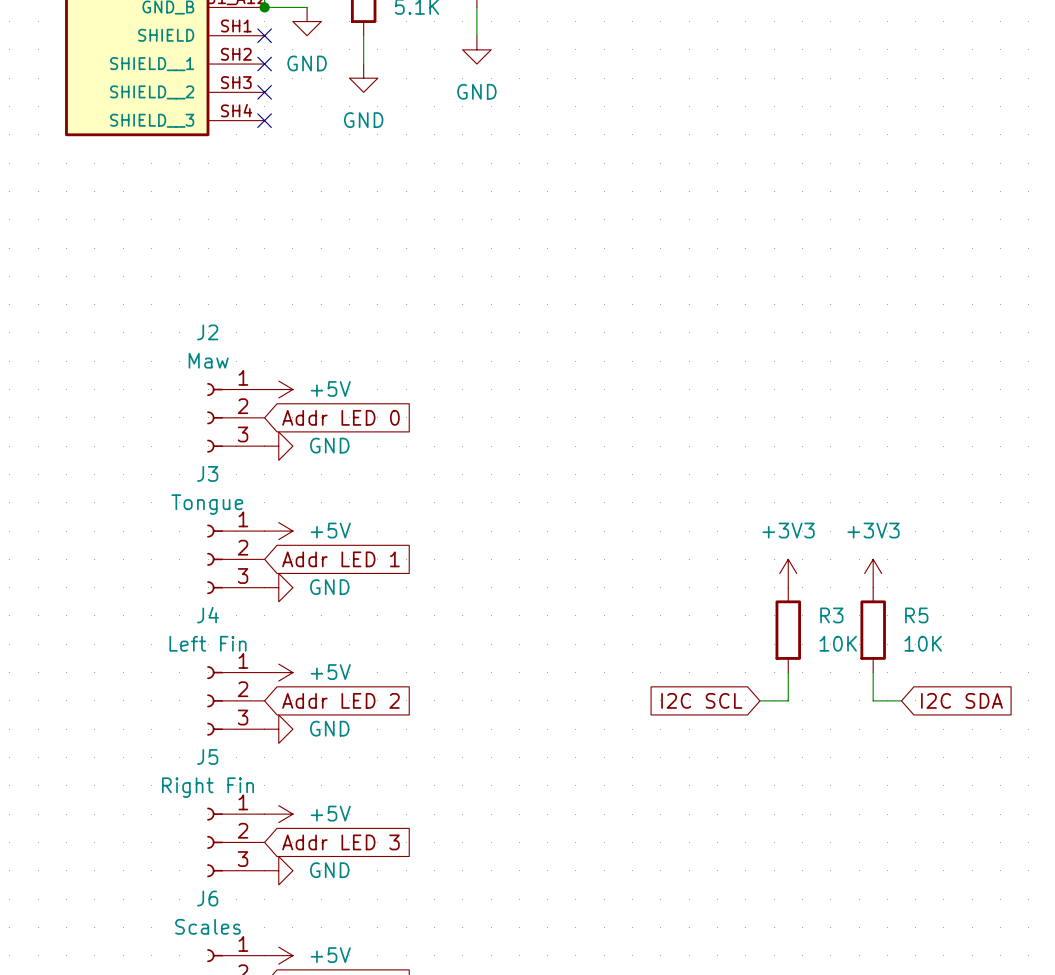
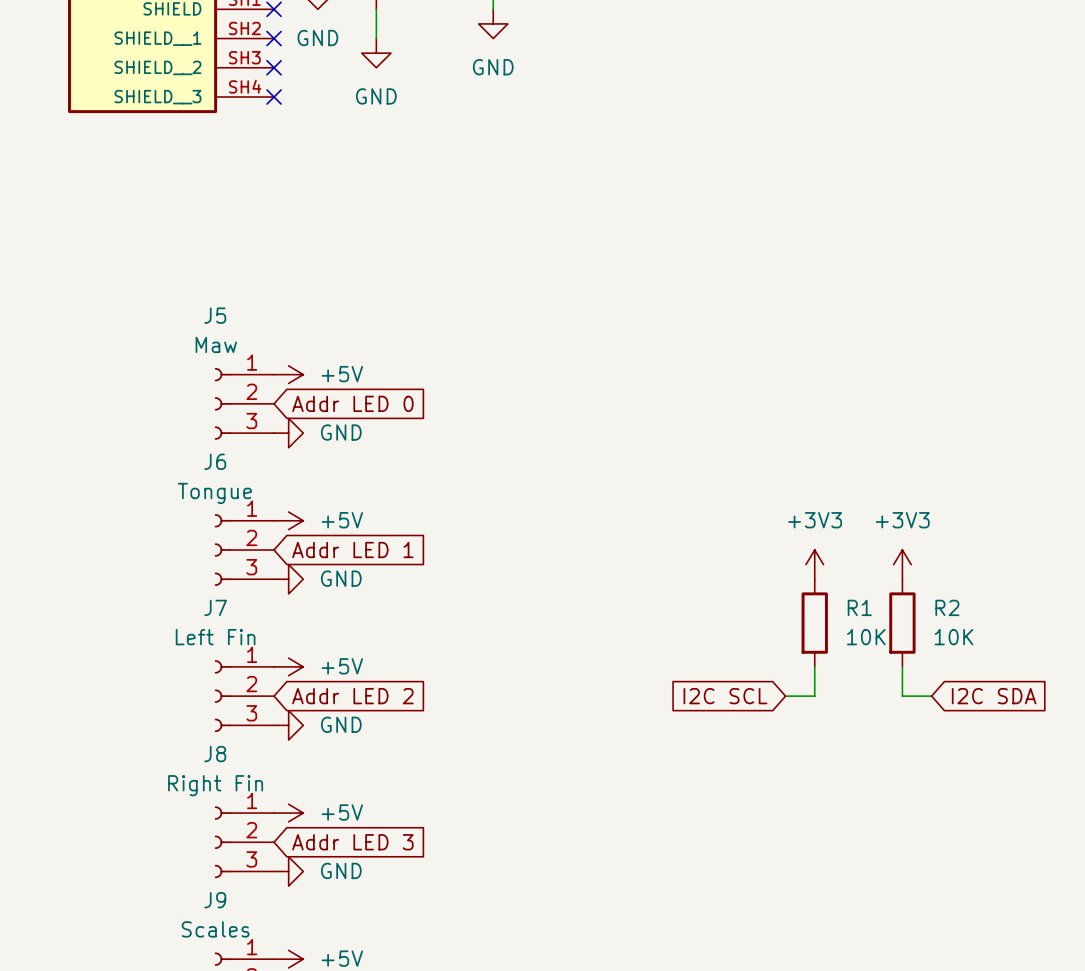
J2 name: J2 (207, 332) -> J5 (215, 315)
J3 name: J3 (207, 473) -> J6 (215, 461)
J4 name: J4 (208, 615) -> J7 (215, 607)
R3 name: R3 (831, 615) -> R1 (859, 607)
R5 name: R5 (916, 615) -> R2 (947, 607)
J5 name: J5 (207, 756) -> J8 (215, 754)
J6 name: J6 (207, 898) -> J9 (215, 900)

